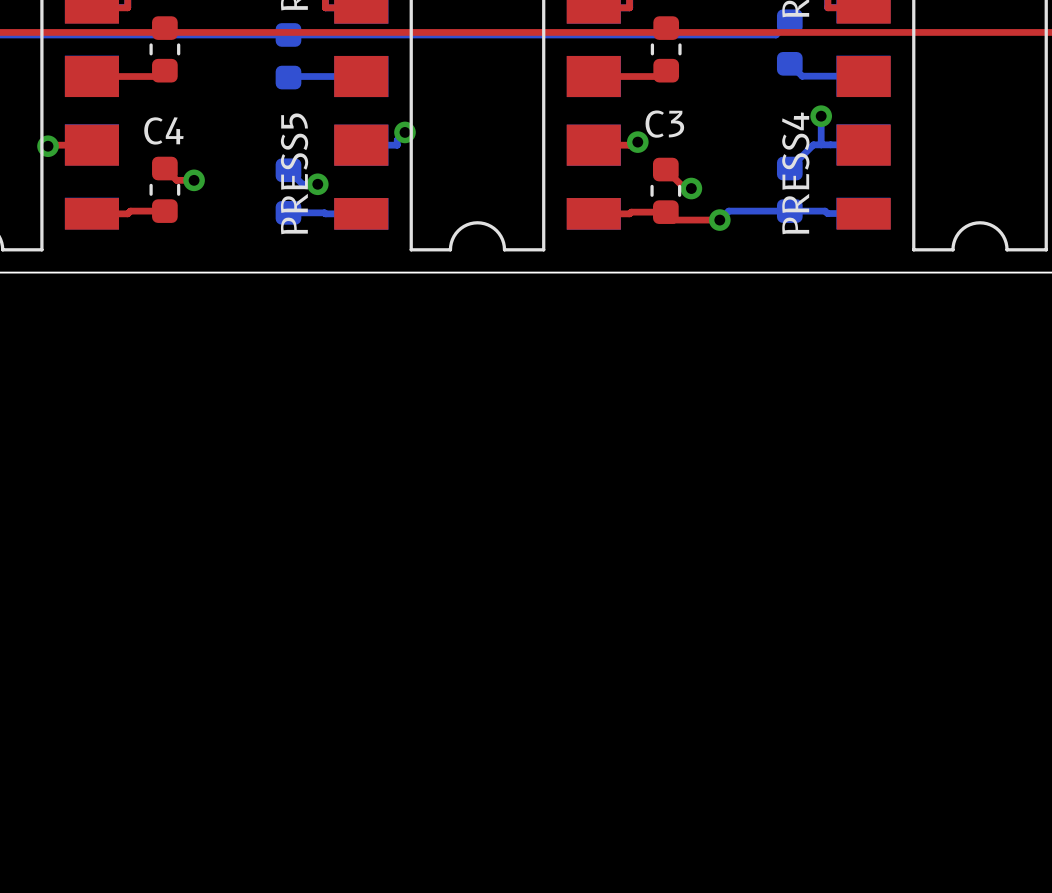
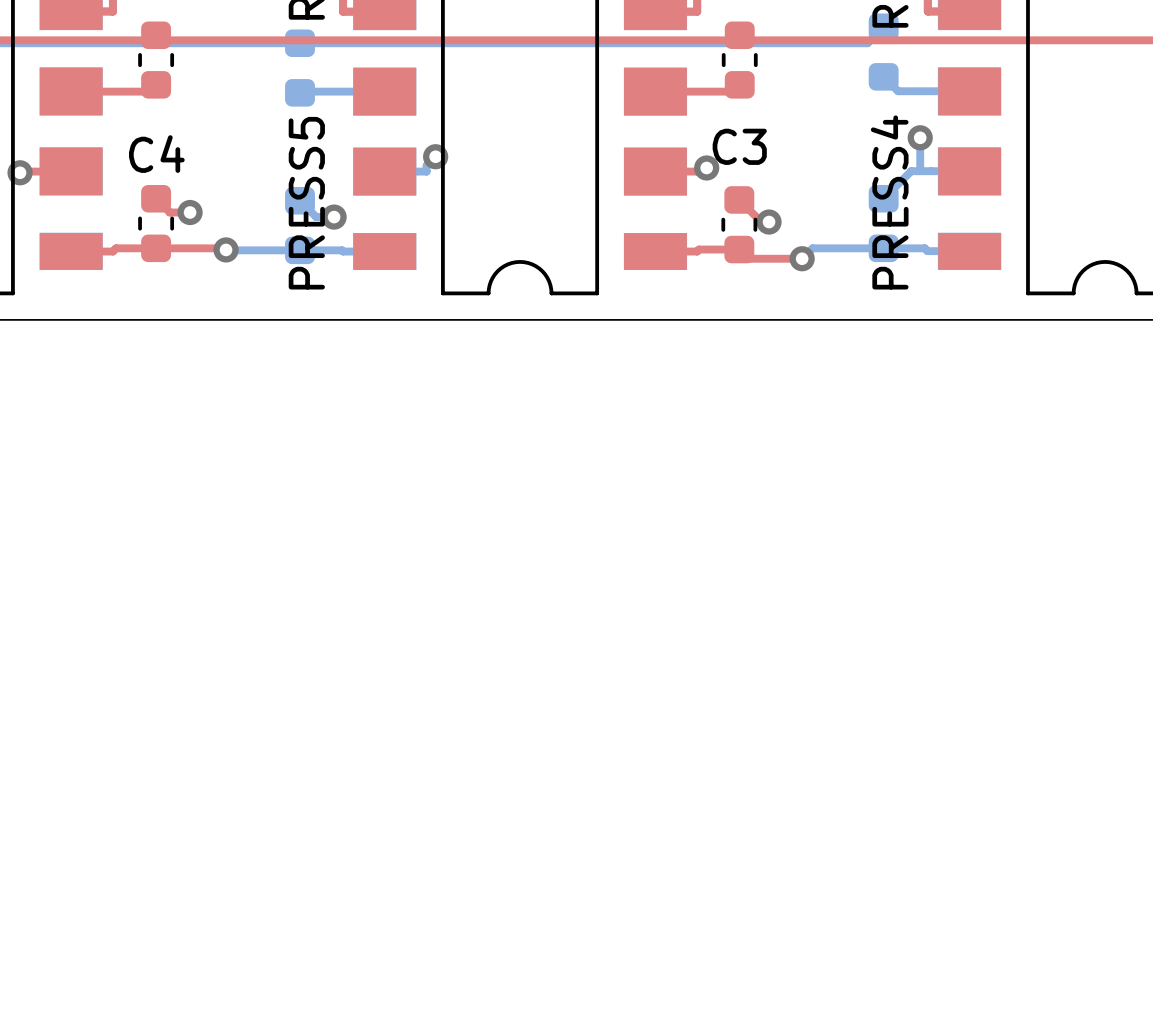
top track: none -> (156, 248) (224, 248) (226, 249)
via: none -> (226, 249)
bottom track: none -> (226, 250) (300, 250)

